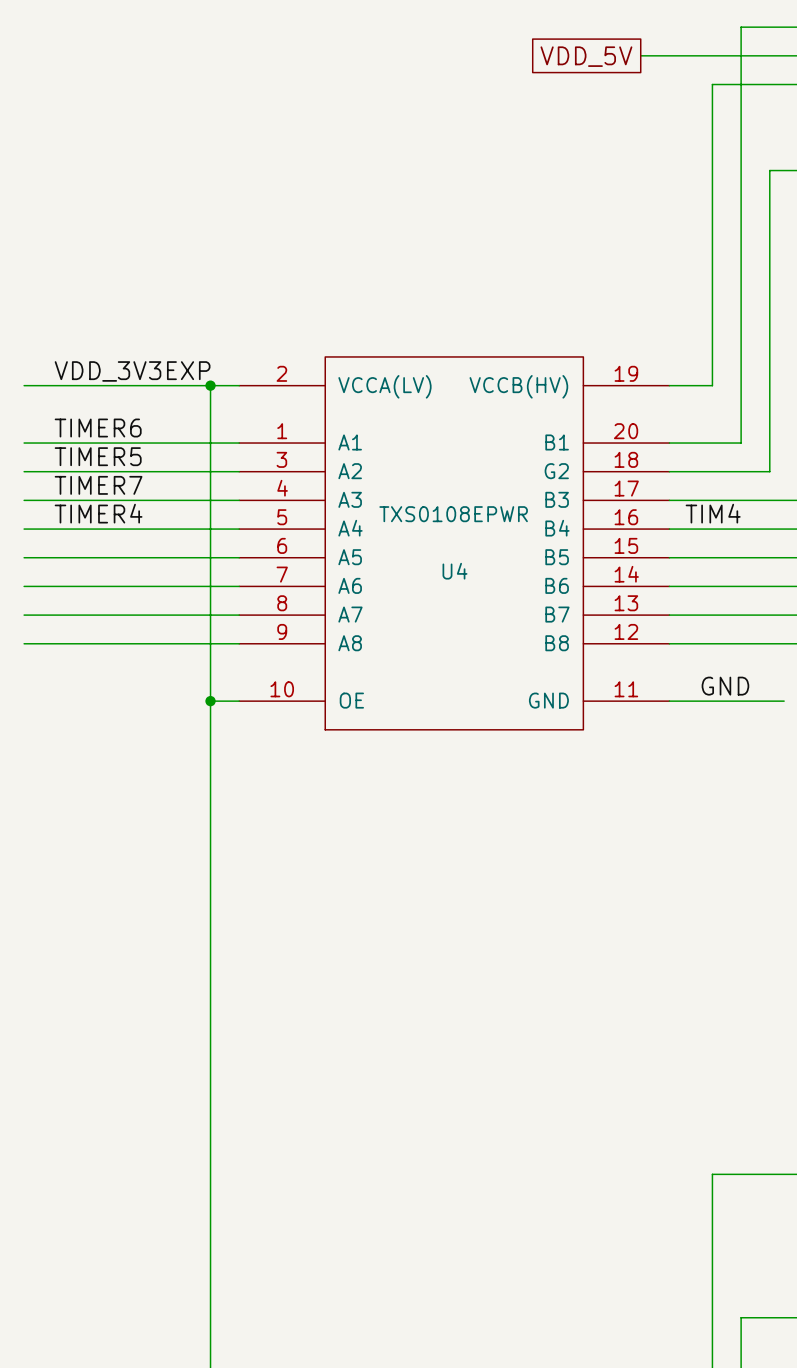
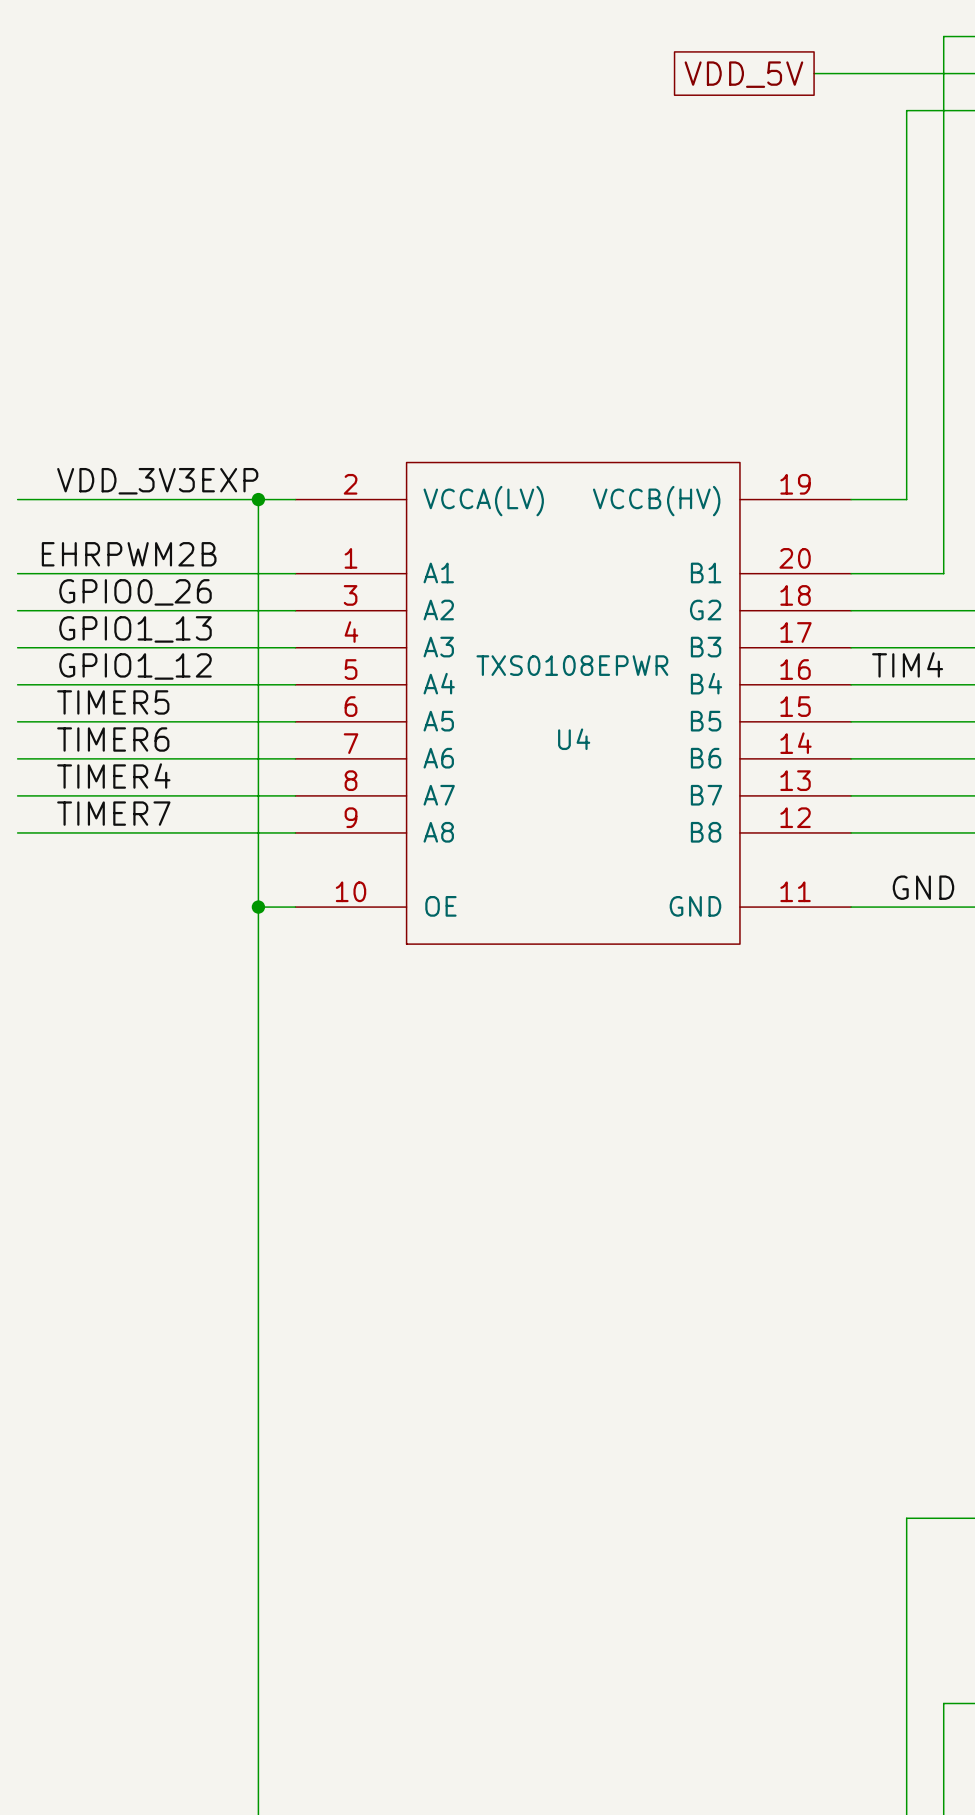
label position: TIMER6 (98, 428) -> TIMER6 (113, 739)
label: none -> EHRPWM2B (129, 554)
label: TIMER5 (98, 456) -> GPIO0_26 (135, 592)
label: TIMER7 (98, 485) -> GPIO1_13 (135, 629)
label: TIMER4 (98, 513) -> GPIO1_12 (135, 666)
label: none -> TIMER5 (113, 702)
label: none -> TIMER4 (113, 776)
label: none -> TIMER7 (113, 813)

